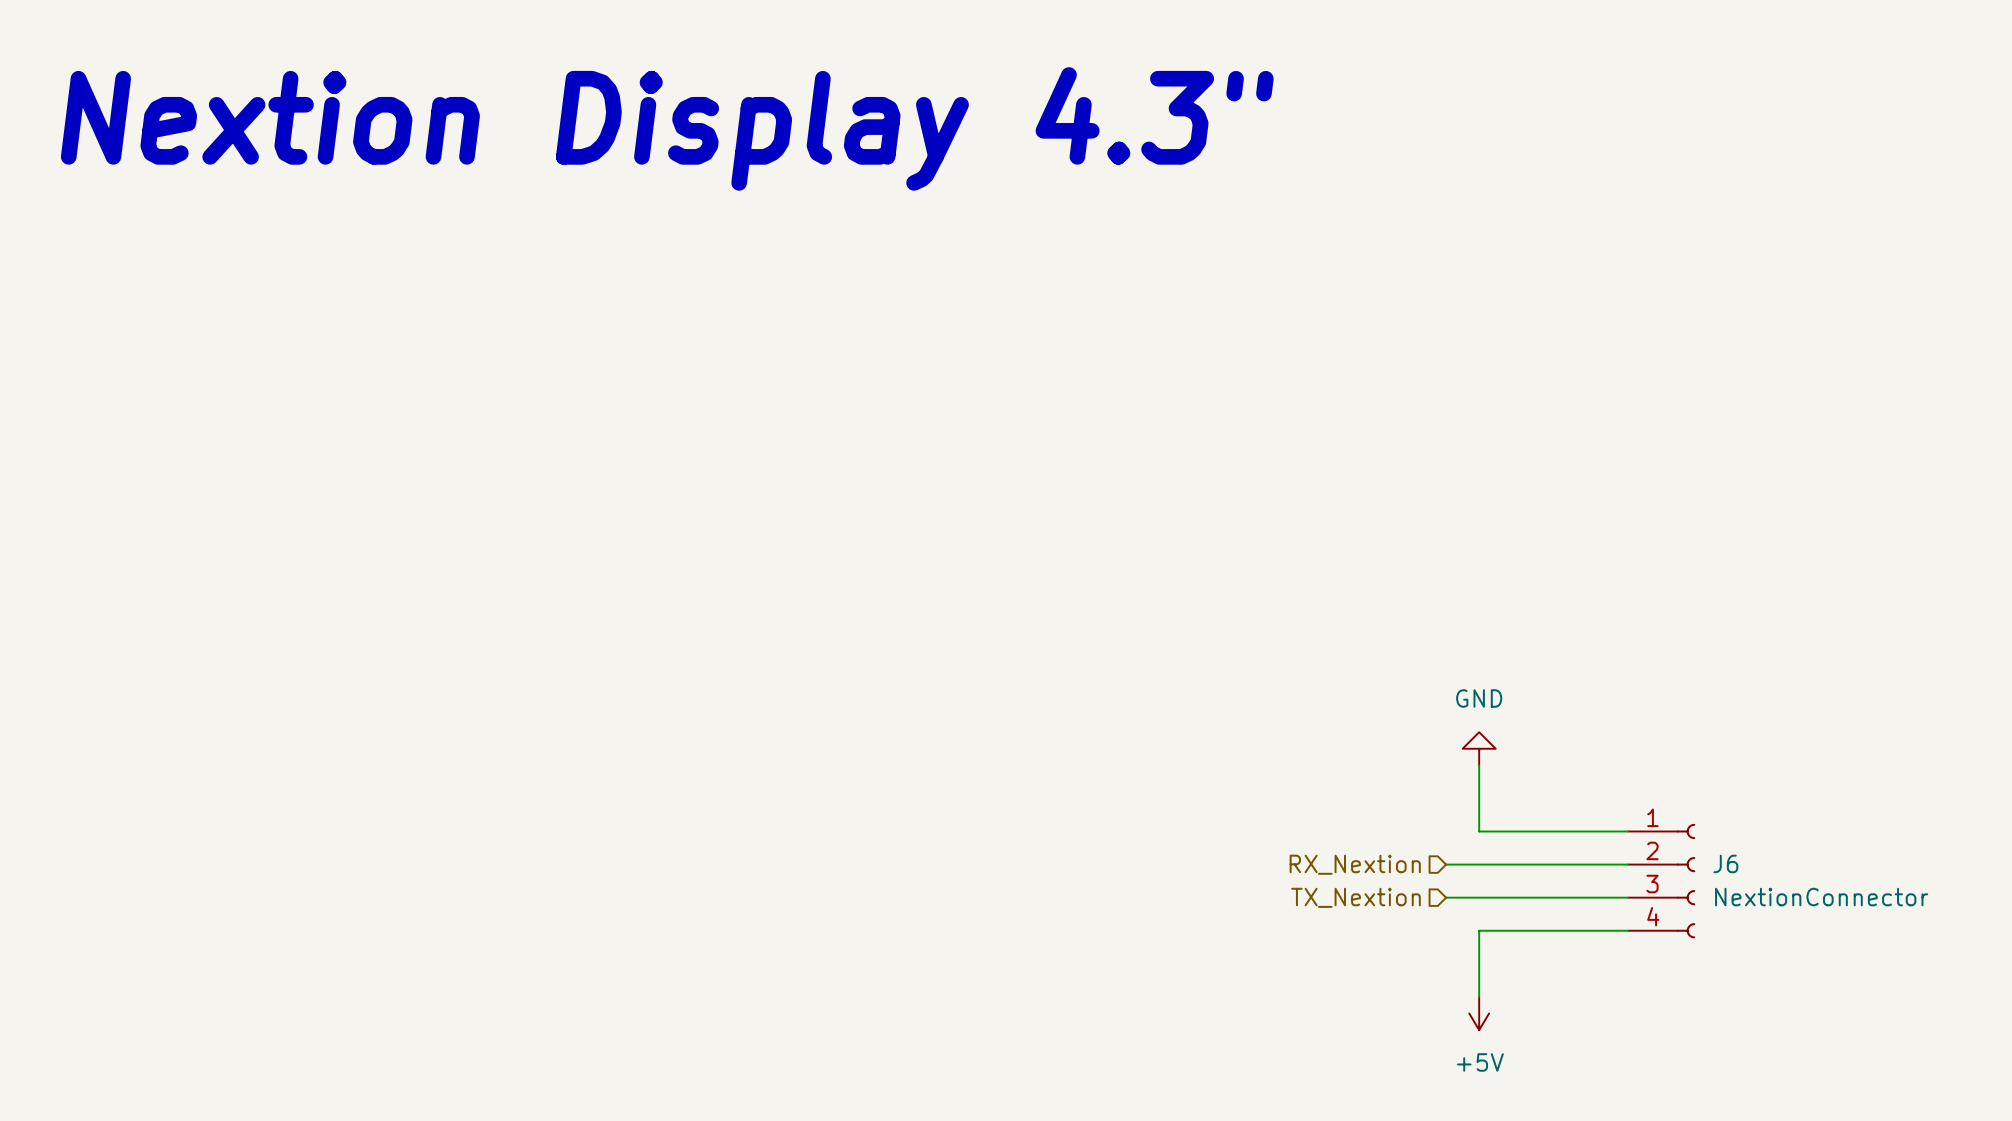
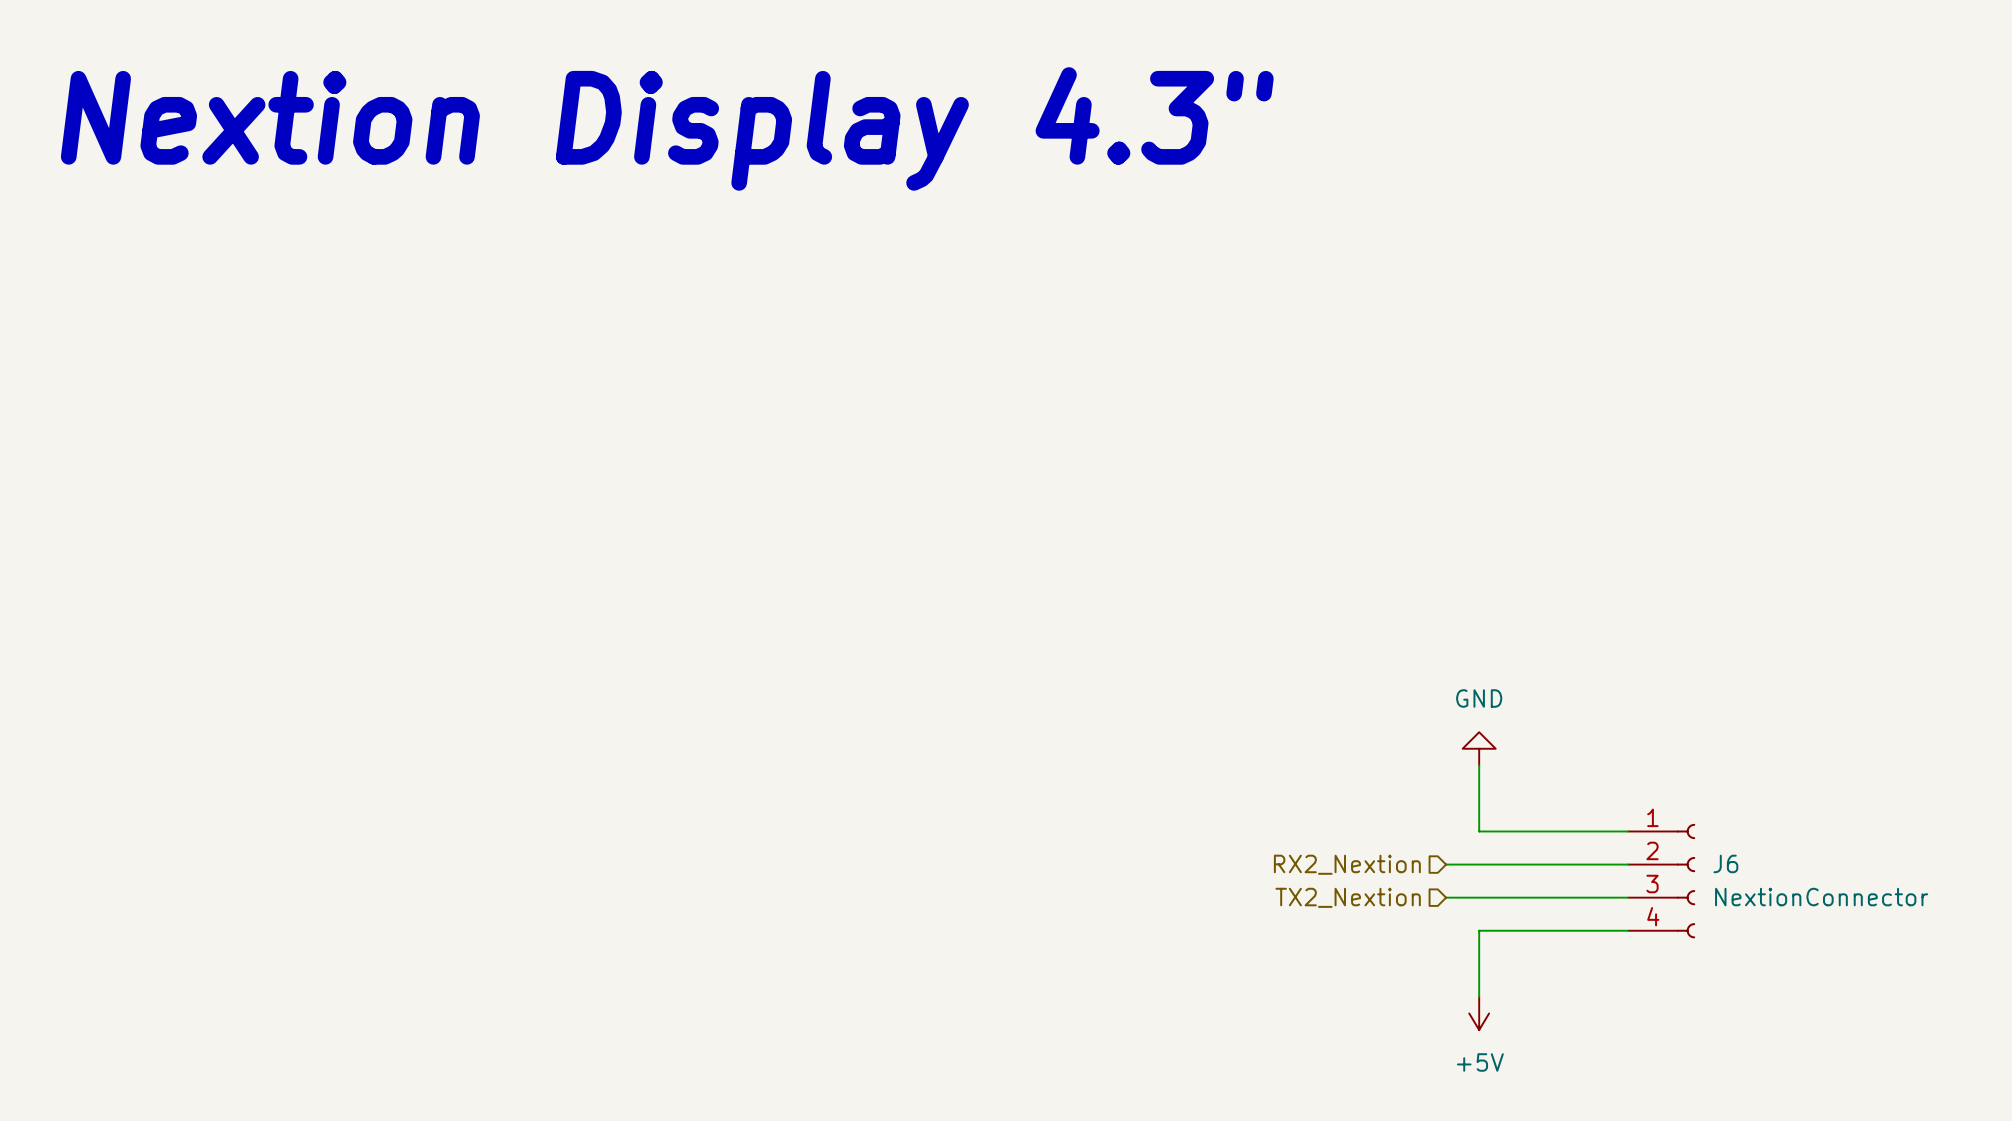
hierarchical label: RX_Nextion (1355, 864) -> RX2_Nextion (1347, 864)
hierarchical label: TX_Nextion (1356, 897) -> TX2_Nextion (1348, 897)

